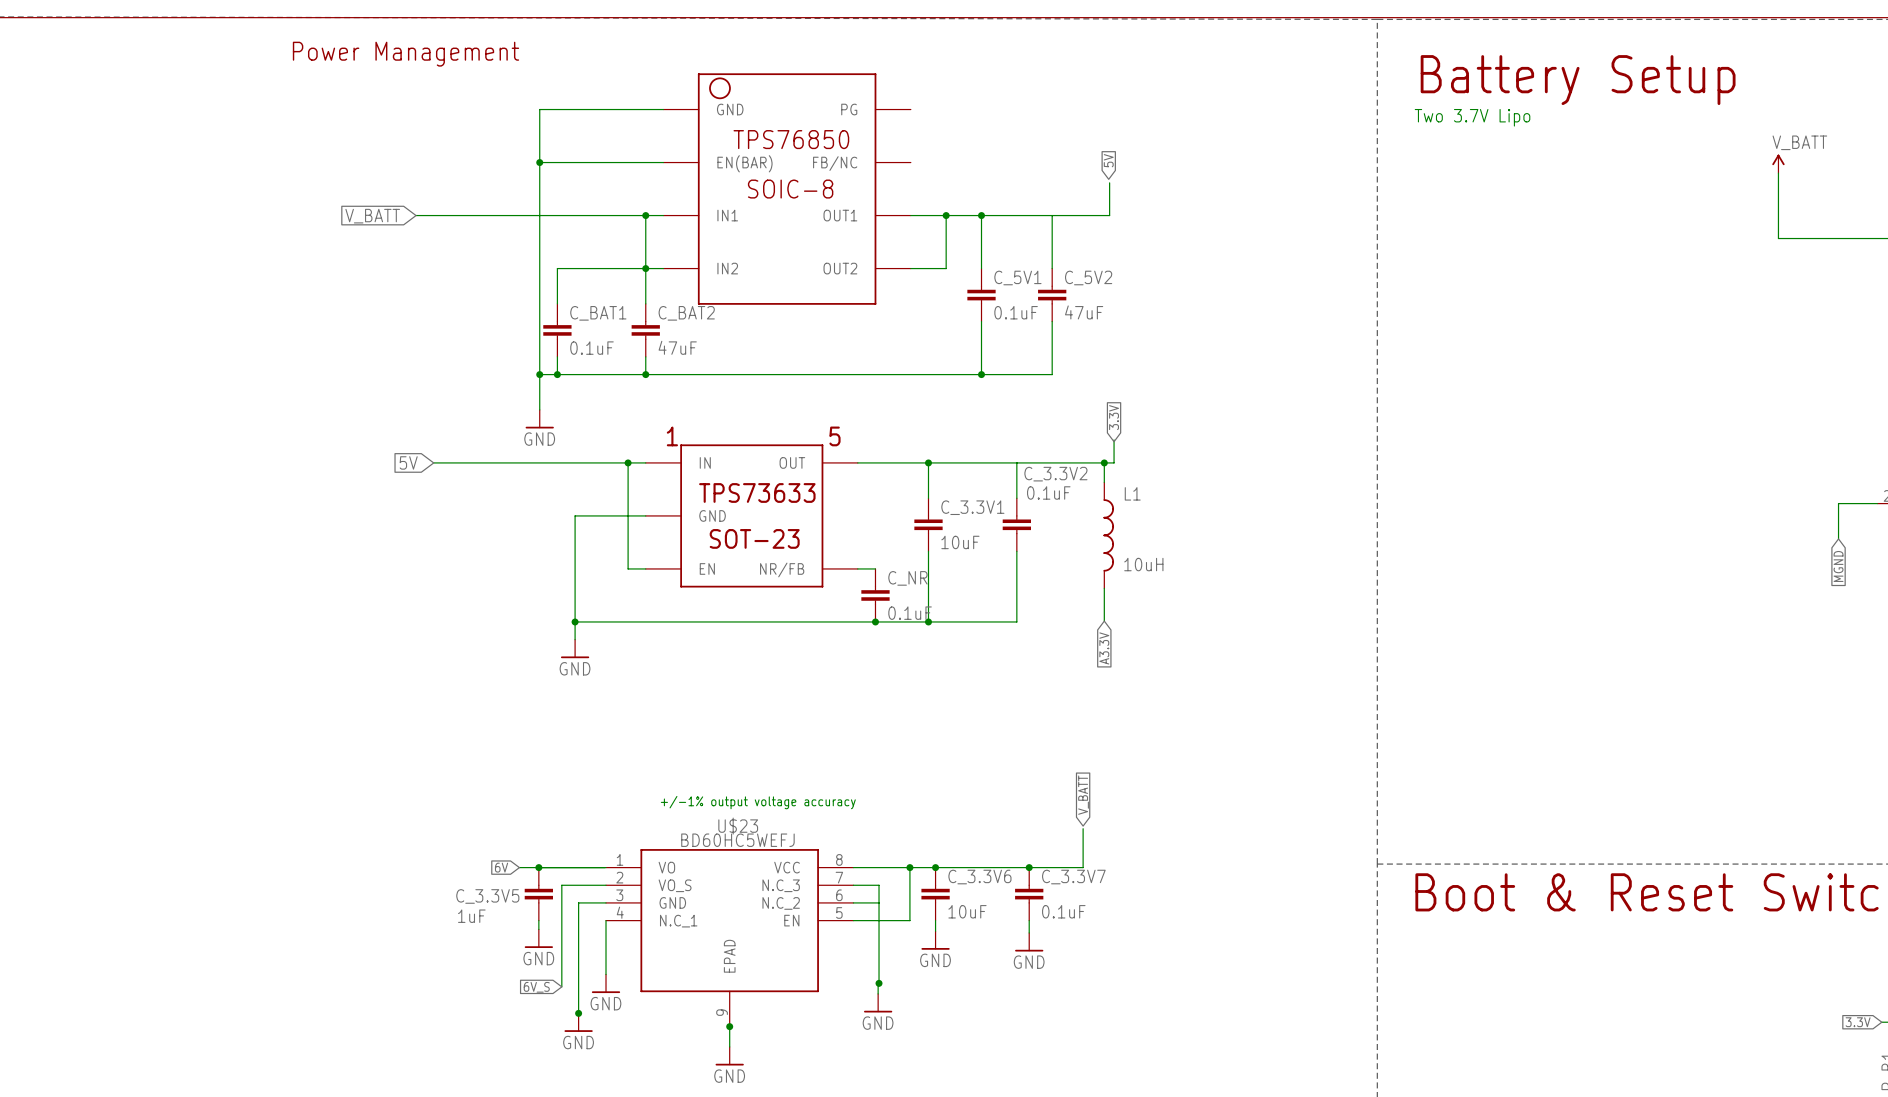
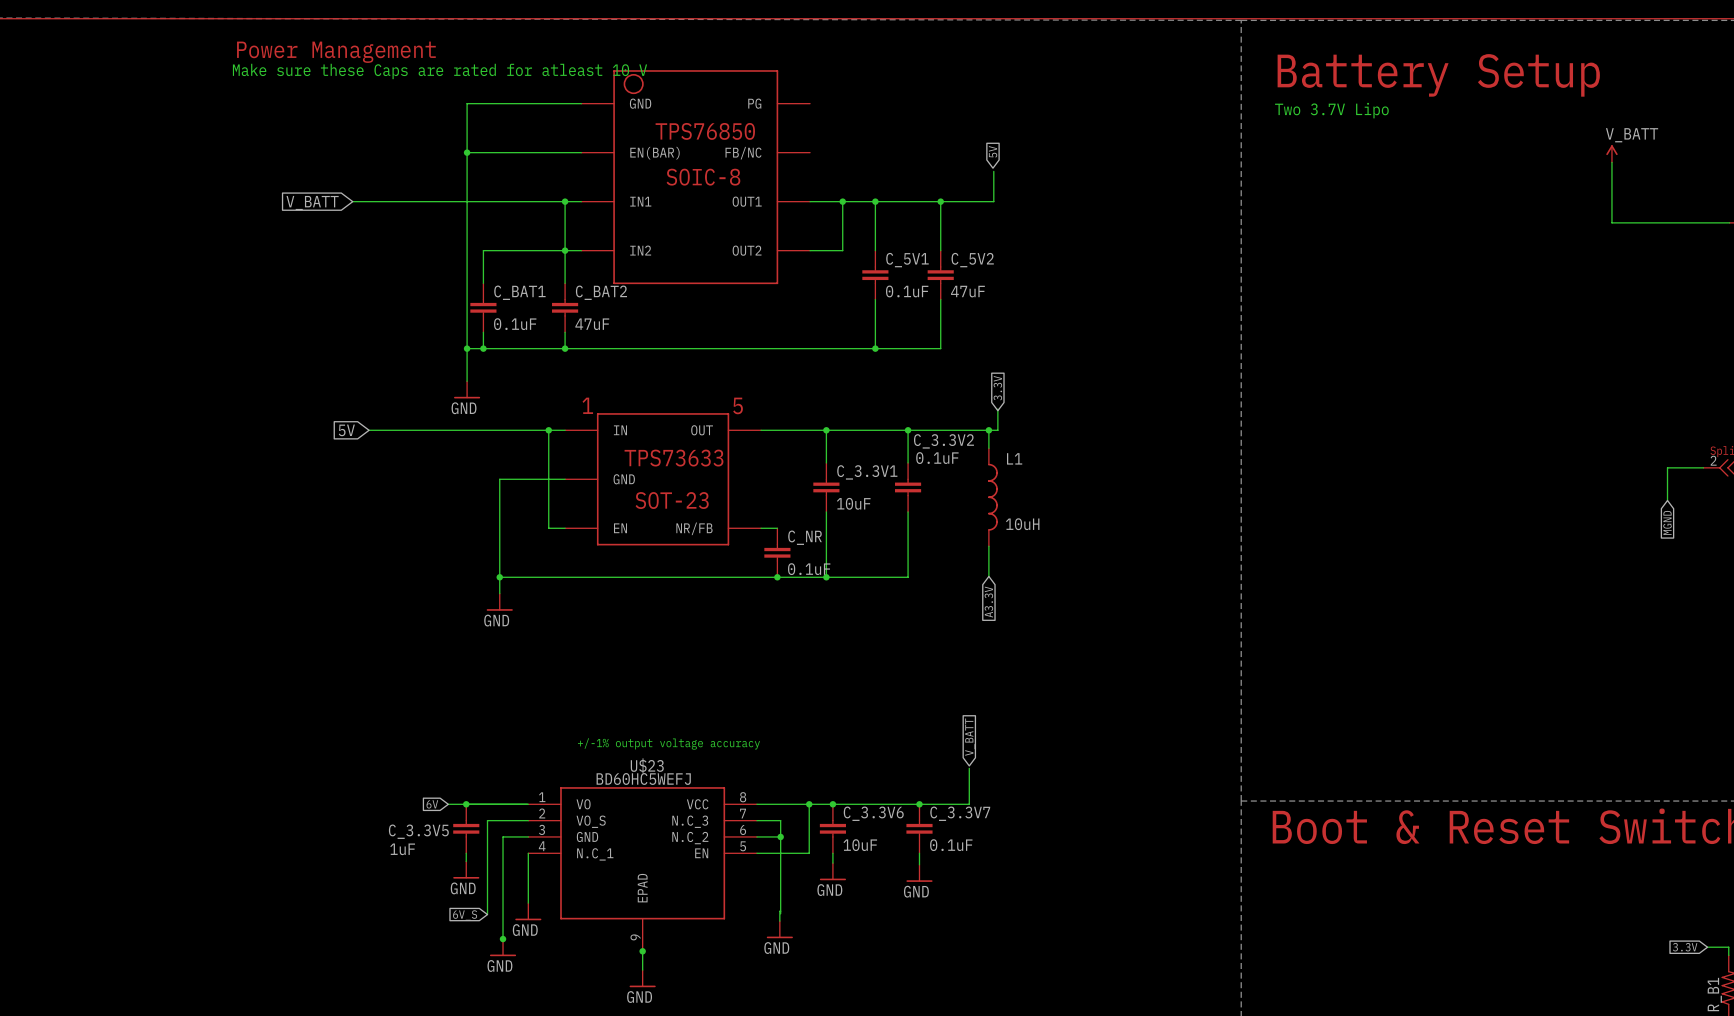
text: none -> Make sure these Caps are rated for atleast 10 V (439, 71)
junction: none -> (940, 201)
junction: none -> (908, 430)
junction: none -> (780, 836)
junction: (879, 983) -> none

